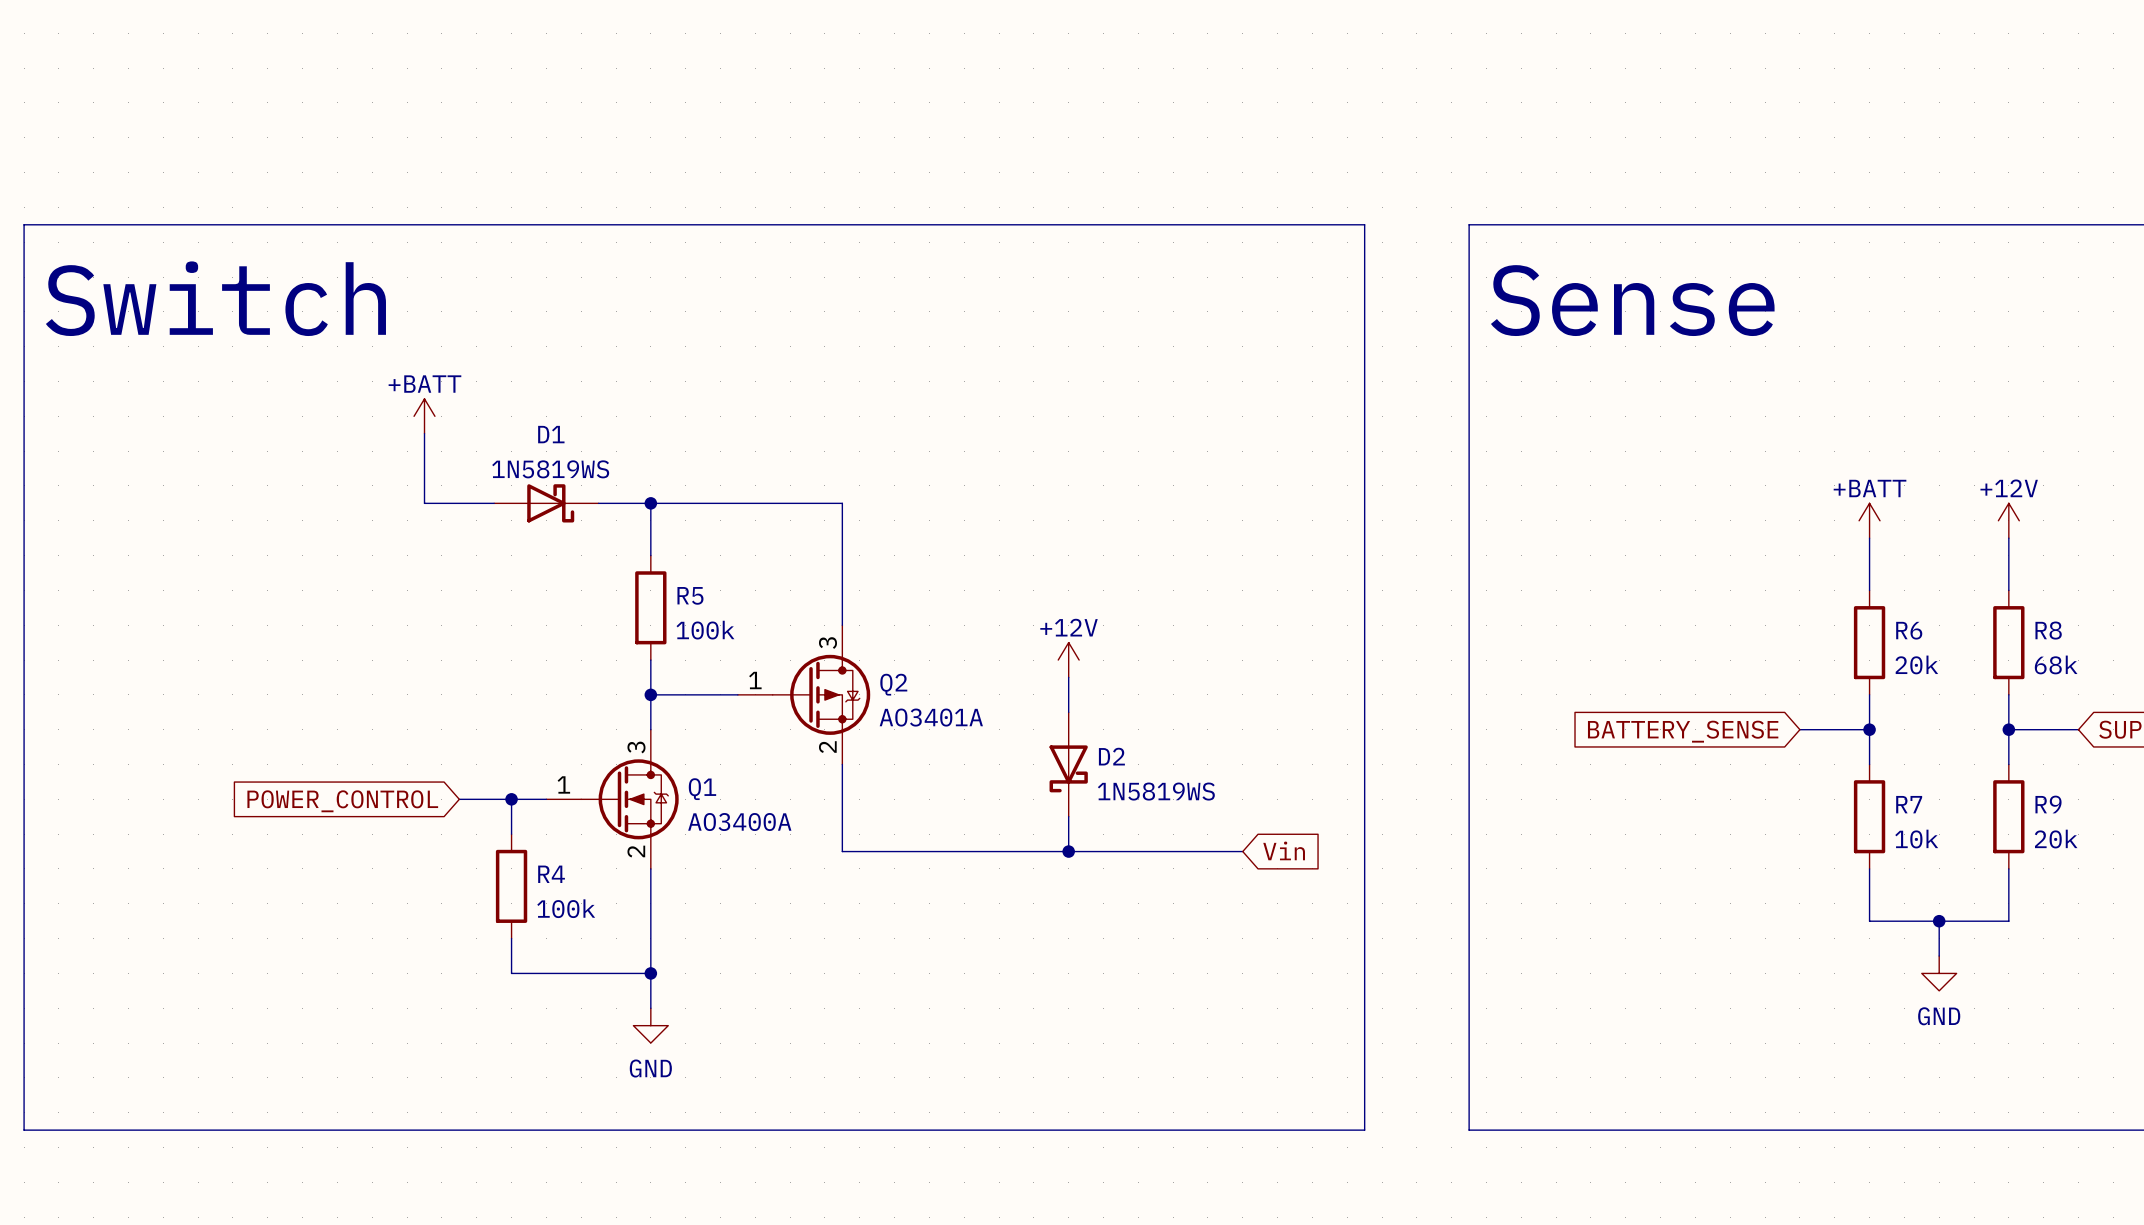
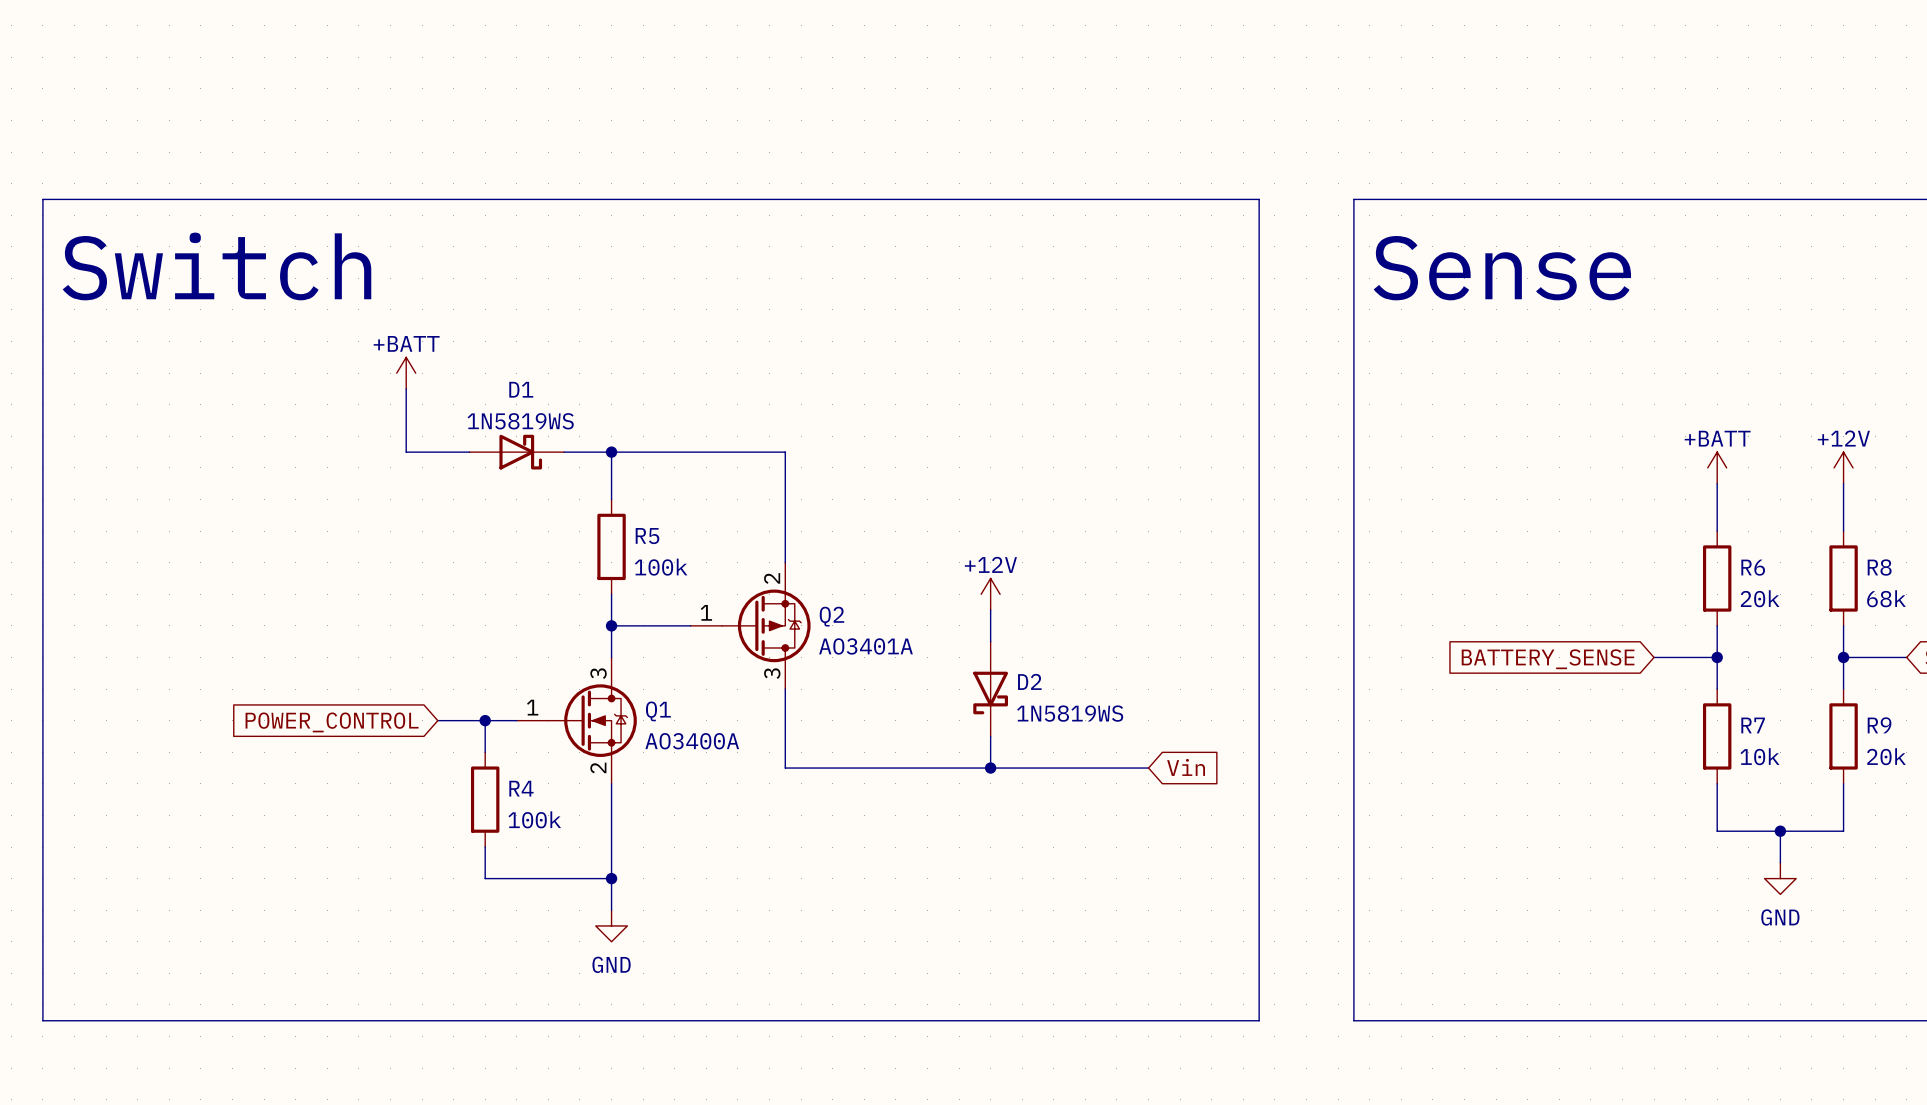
Q2 flip: as is (821, 694) -> up-down (766, 625)

